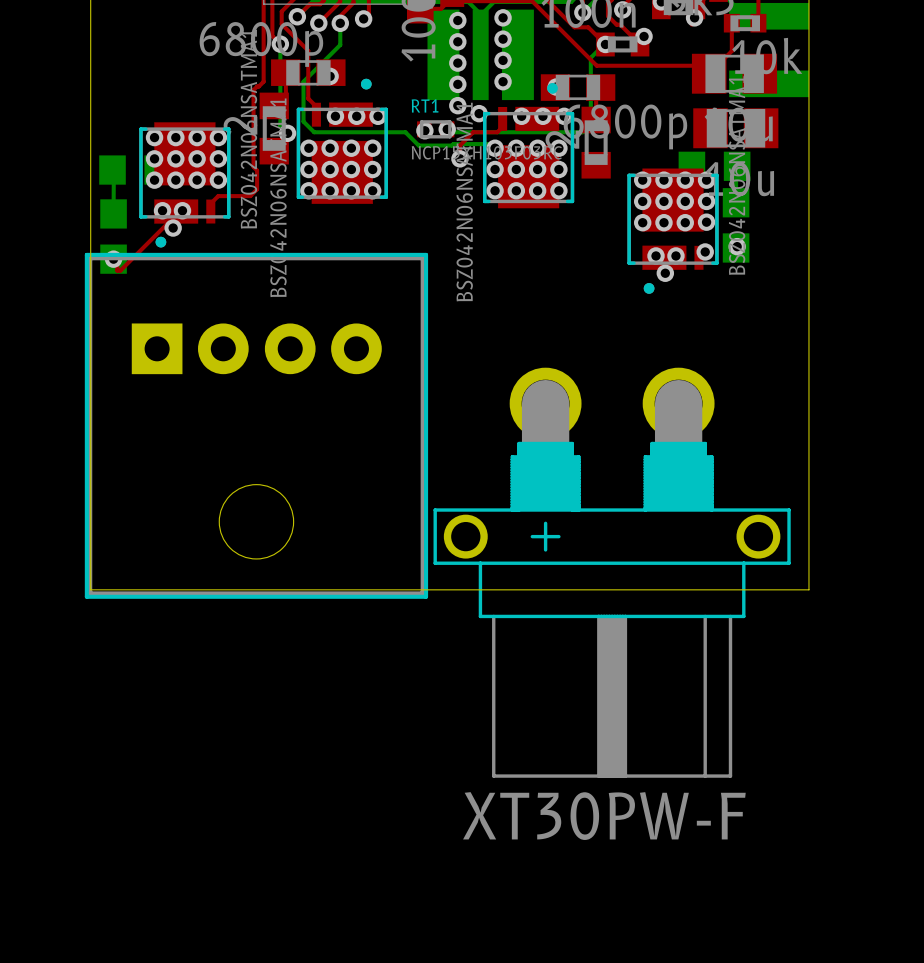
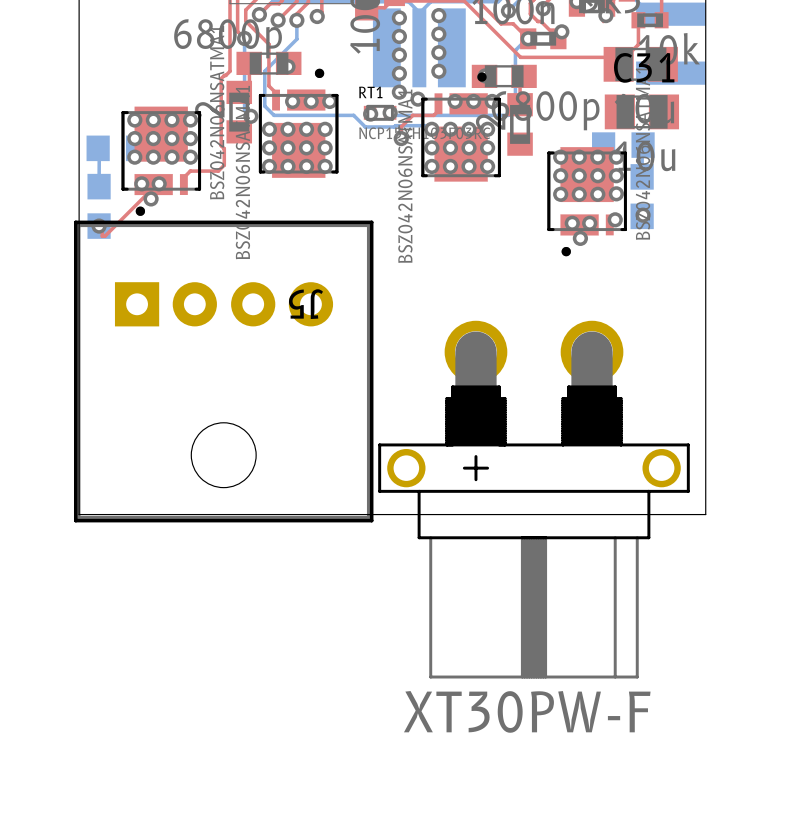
C31 name: none -> C31 (644, 67)
J5 name: none -> J5 (305, 304)

